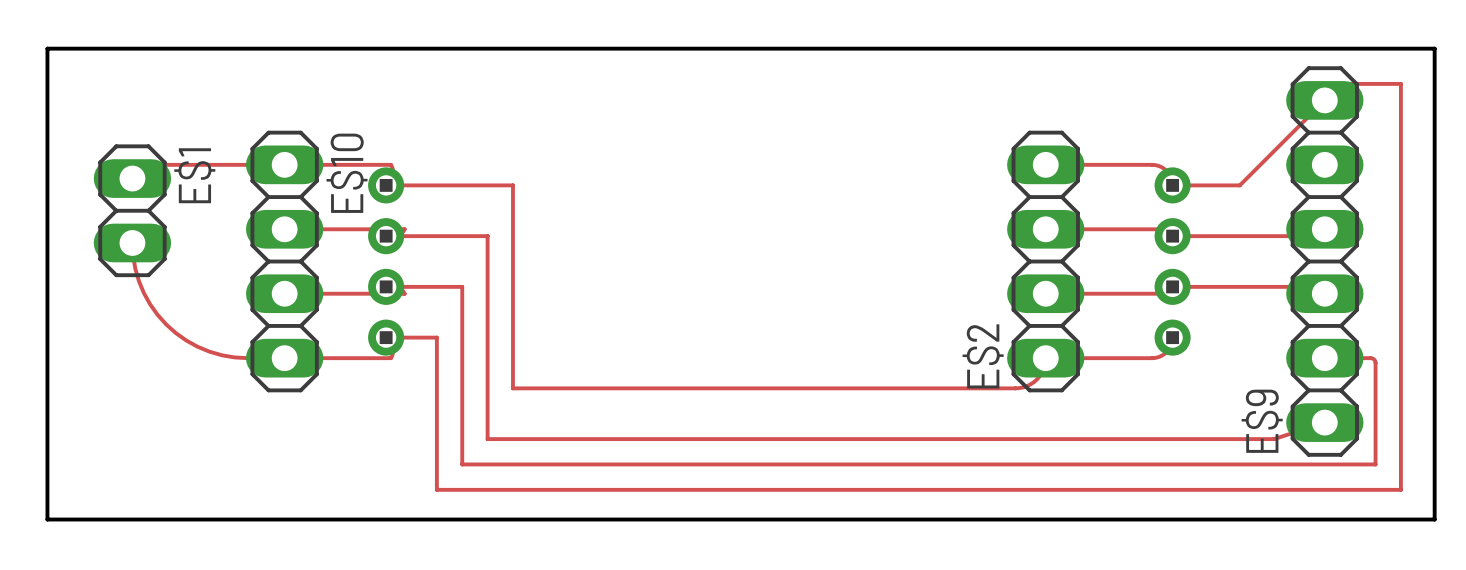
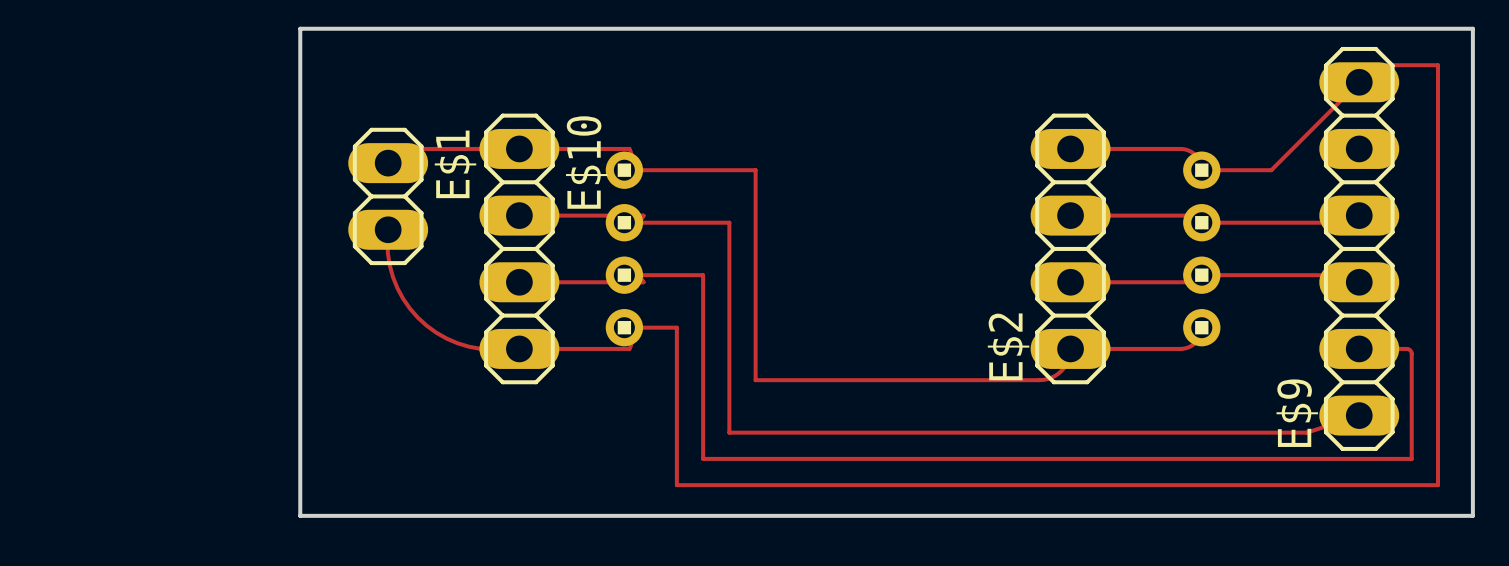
board edge: (301, 48) (47, 48) (47, 519) (301, 519) -> (300, 28) (300, 515)
track: (132, 178) (136, 168) (146, 164) (390, 164) (392, 176) (386, 185) (512, 185) (512, 388) (741, 388) -> (388, 163) (392, 153) (402, 148) (629, 148) (631, 160) (624, 170) (755, 170) (755, 380)
E$1 position: (132, 210) -> (388, 196)
track: (284, 229) (404, 229) (400, 234) (398, 235) (396, 236) (391, 237) (386, 236) (487, 236) (487, 439) (715, 439) -> (519, 215) (643, 215) (638, 221) (637, 222) (635, 223) (633, 223) (629, 224) (624, 222) (729, 222) (729, 432)
track: (132, 242) (138, 281) (157, 314) (175, 333) (209, 351) (247, 358) (390, 358) (392, 346) (386, 337) (436, 337) (436, 489) (665, 489) -> (388, 229) (389, 265) (403, 298) (426, 325) (457, 343) (481, 348) (629, 348) (631, 337) (624, 327) (676, 327) (676, 485)
E$10 position: (284, 261) -> (519, 248)
part position: (386, 261) -> (624, 248)
track: (284, 293) (404, 293) (401, 289) (400, 288) (398, 287) (396, 286) (386, 286) (462, 286) (462, 464) (690, 464) -> (519, 282) (643, 282) (640, 277) (638, 276) (637, 275) (635, 274) (624, 275) (703, 275) (703, 458)

